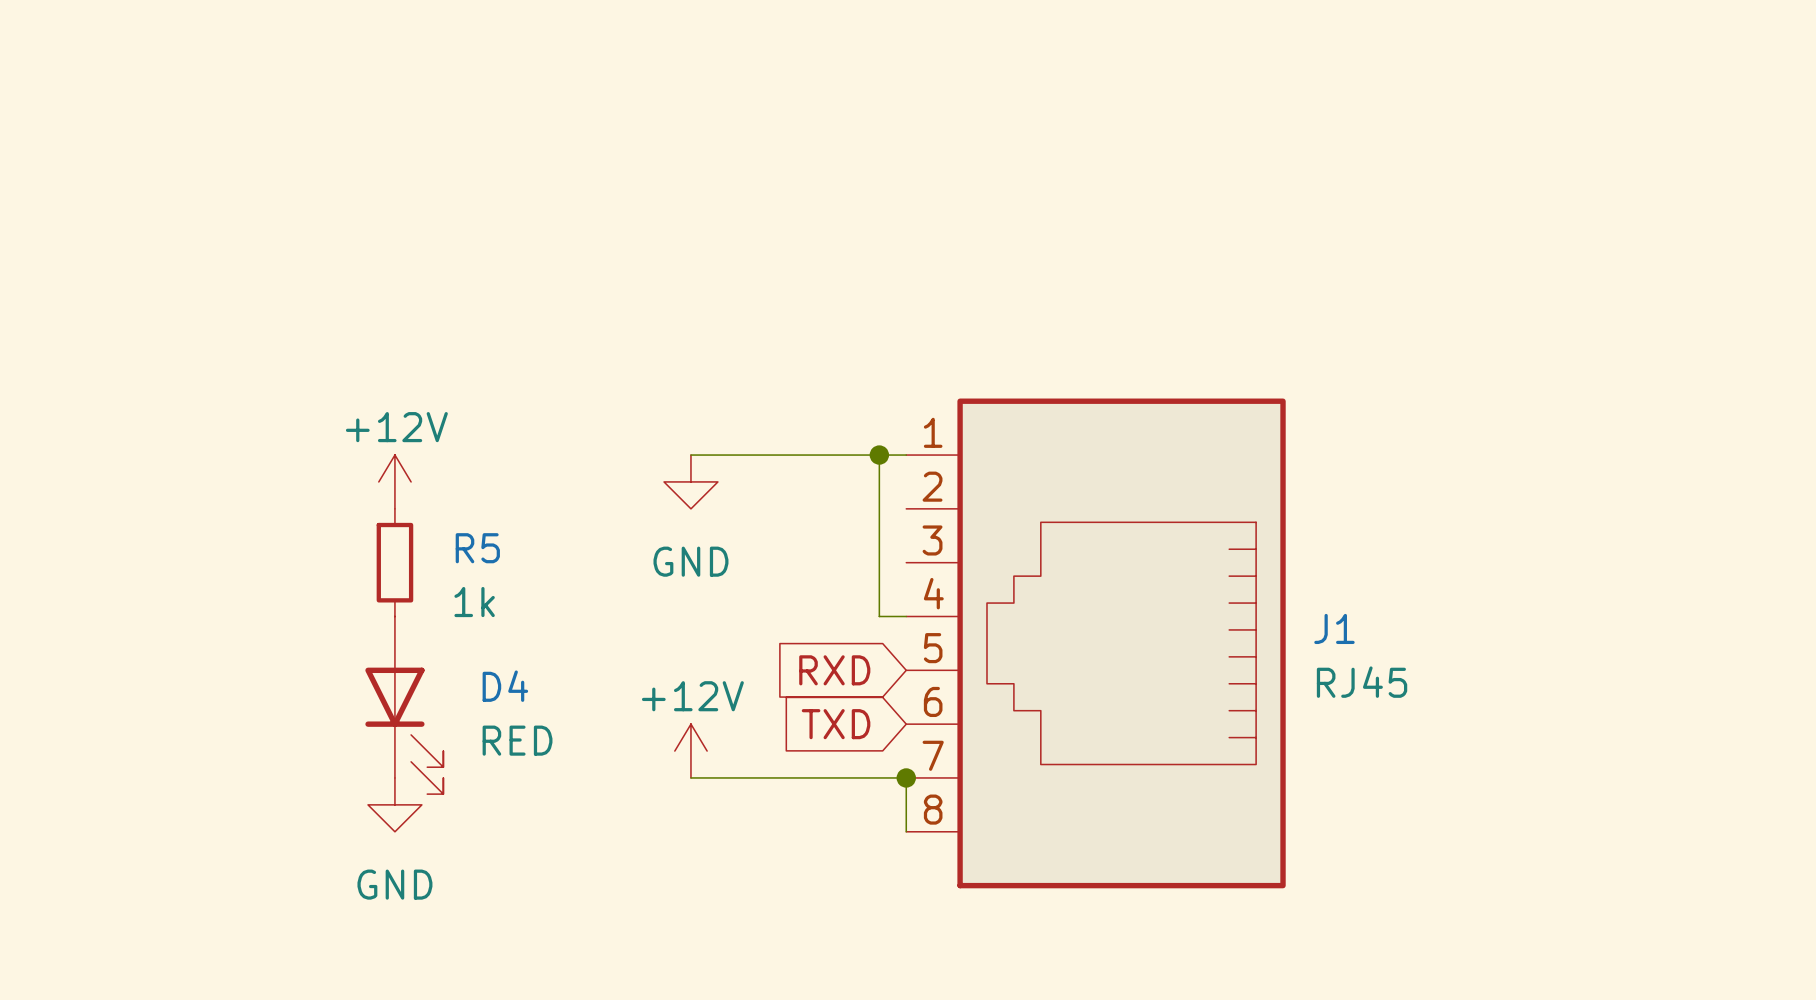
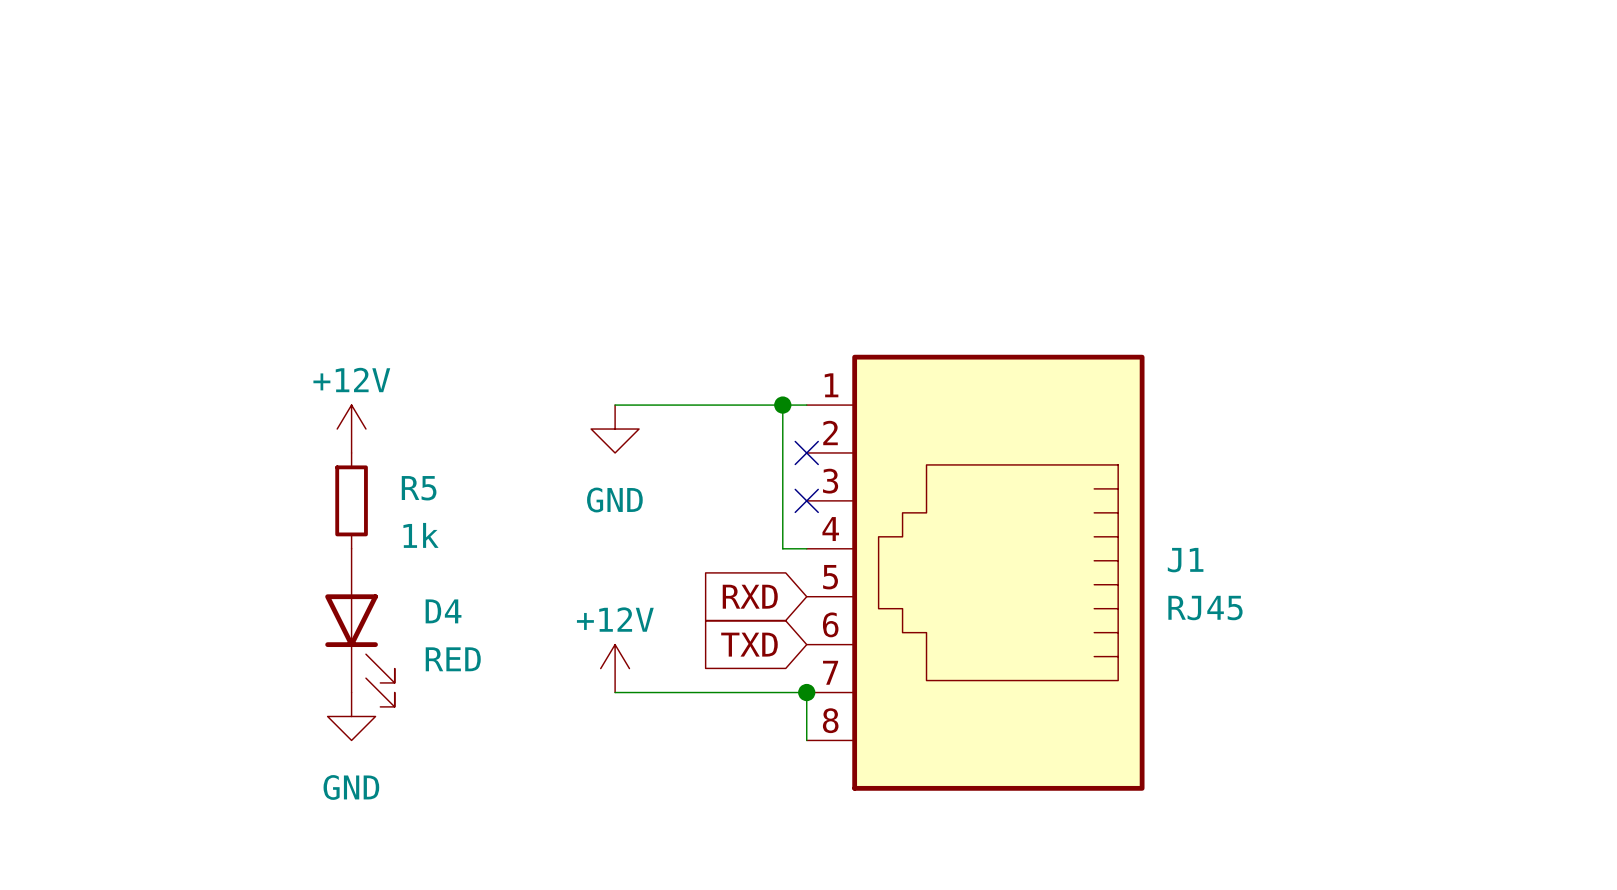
no-connect mark: none -> (806, 452)
no-connect mark: none -> (806, 500)

